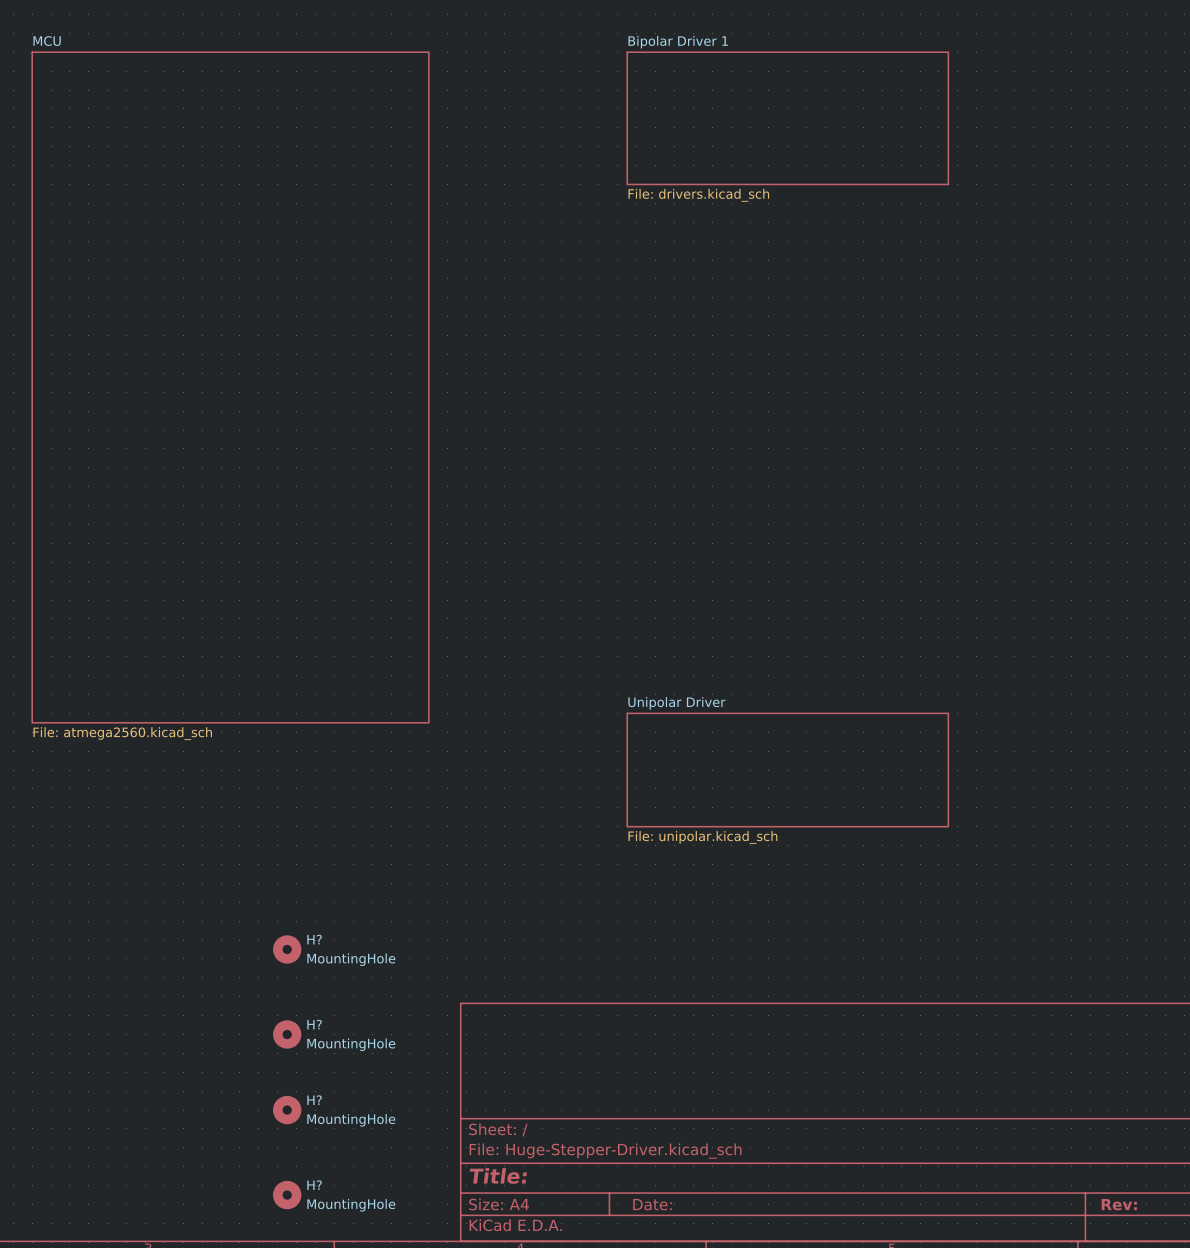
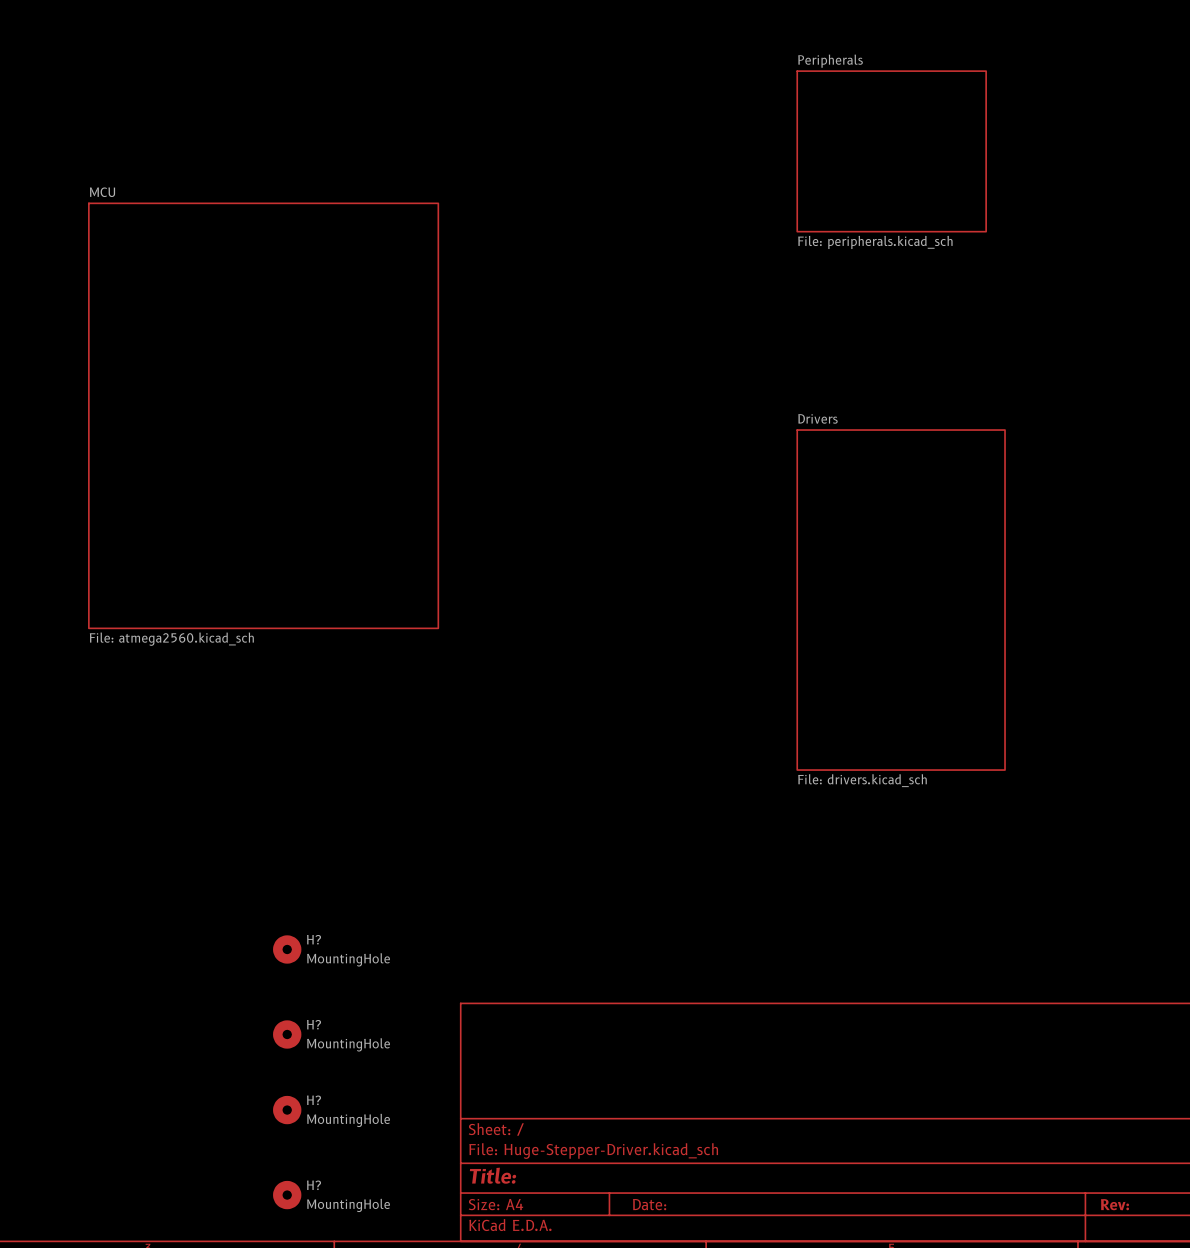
sheet Bipolar Driver 1: File: drivers.kicad_sch (787, 118) -> none
sheet Peripherals: none -> File: peripherals.kicad_sch (891, 151)
sheet MCU: File: atmega2560.kicad_sch (230, 387) -> none
sheet MCU: none -> File: atmega2560.kicad_sch (263, 415)
sheet Drivers: none -> File: drivers.kicad_sch (901, 600)
sheet Unipolar Driver: File: unipolar.kicad_sch (787, 770) -> none

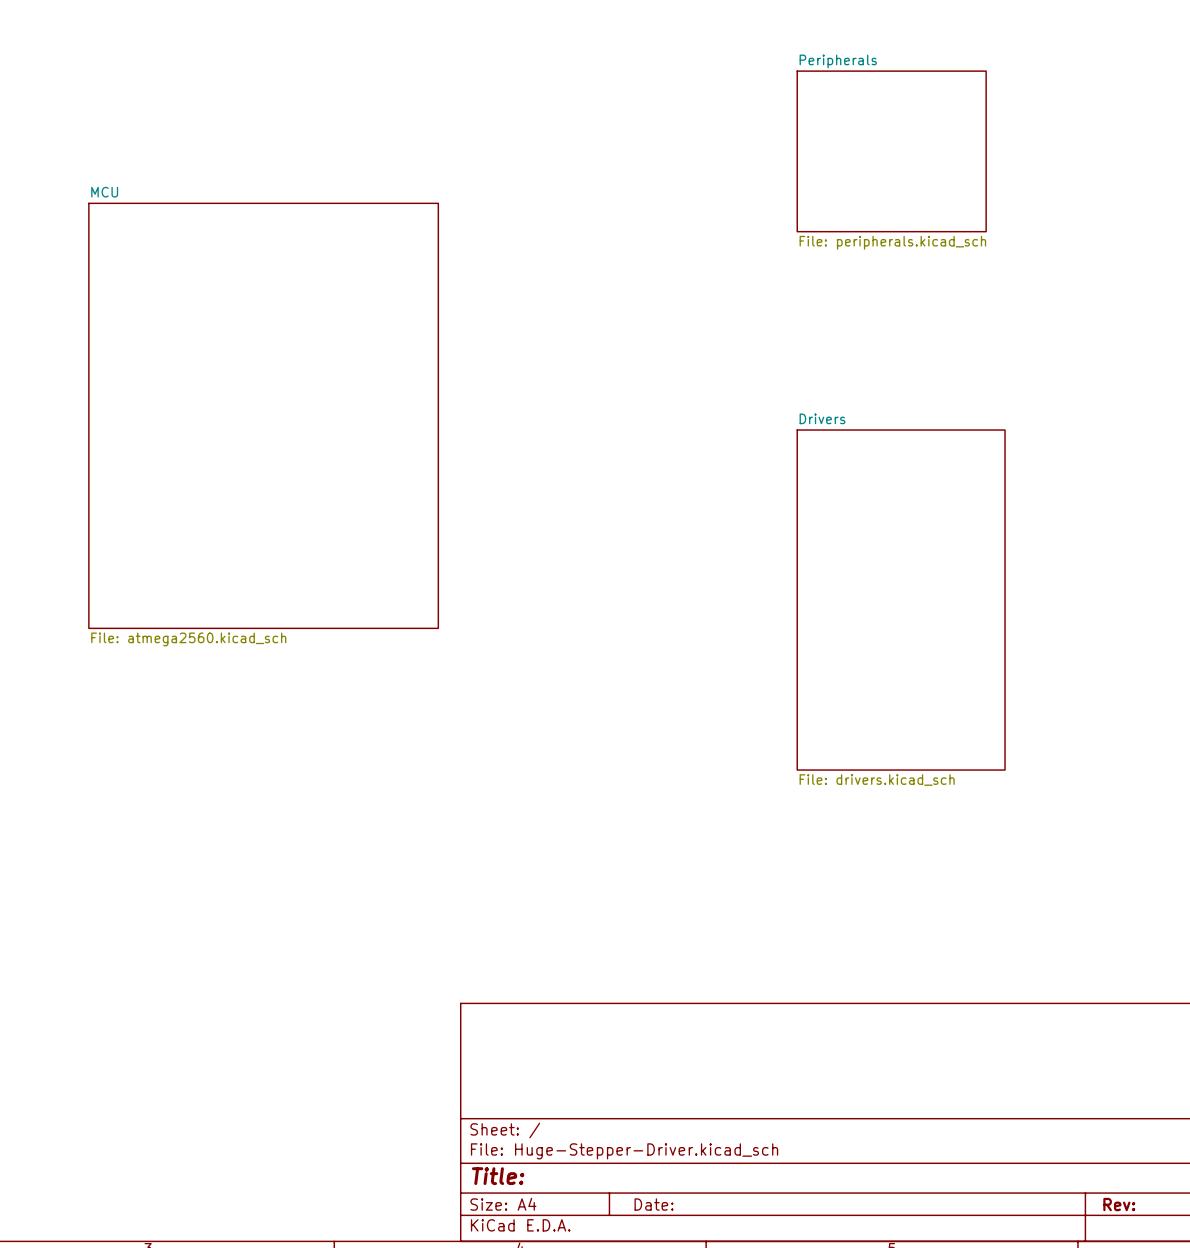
H?: MountingHole (287, 949) -> none
H?: MountingHole (287, 1034) -> none
H?: MountingHole (287, 1110) -> none
H?: MountingHole (287, 1195) -> none

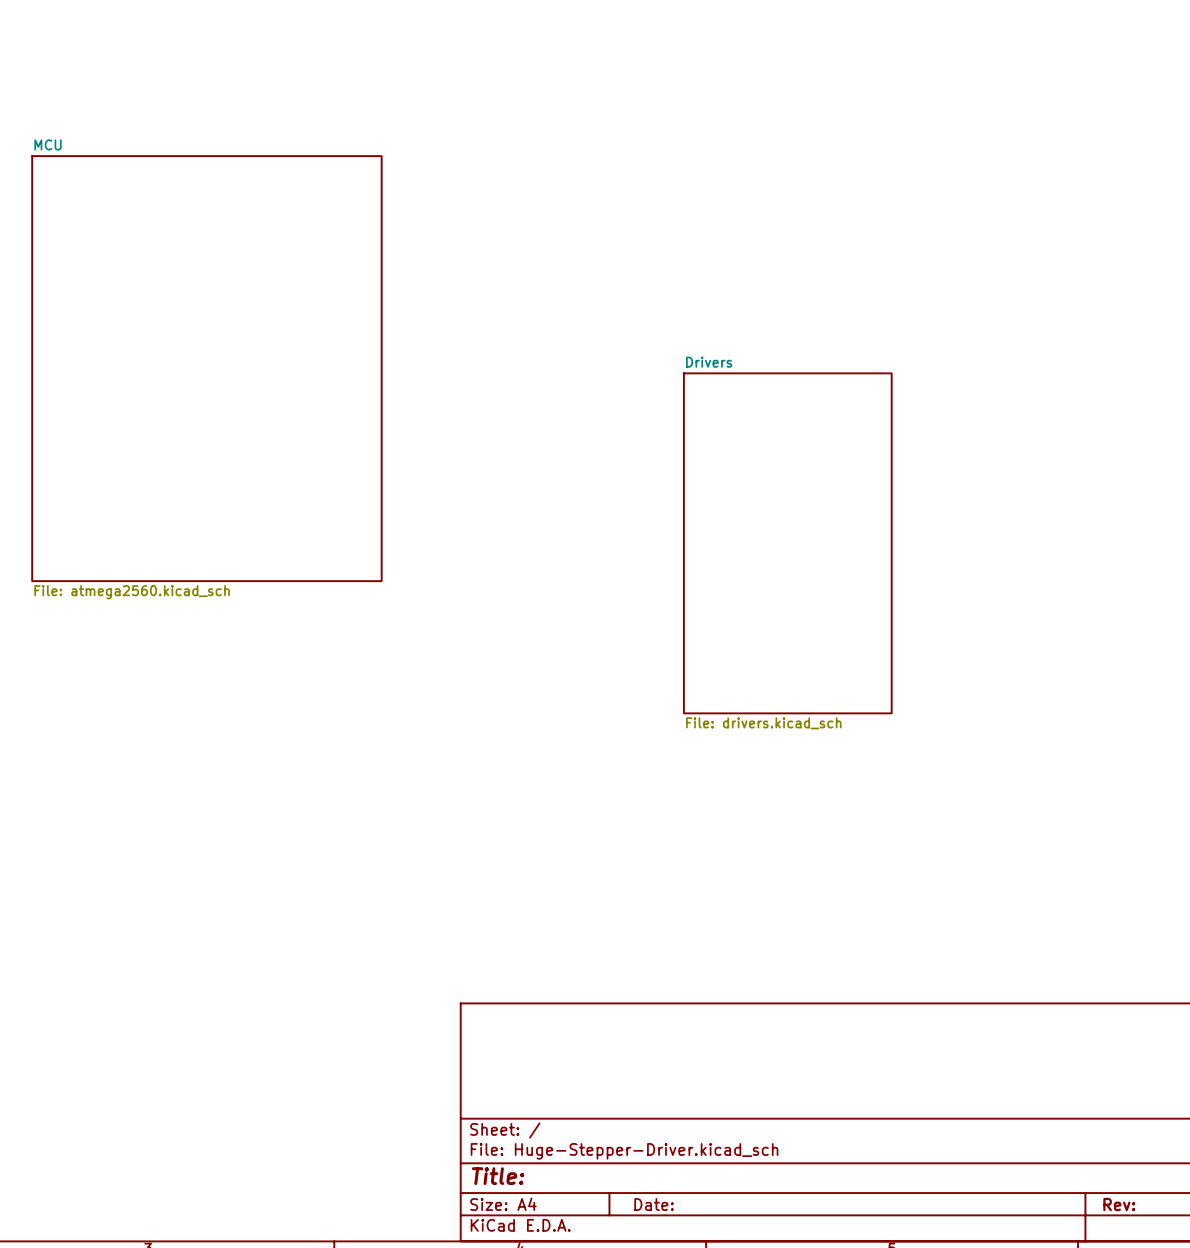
sheet Peripherals: File: peripherals.kicad_sch (891, 151) -> none
sheet MCU position: (263, 415) -> (206, 368)
sheet Drivers position: (901, 600) -> (787, 543)

